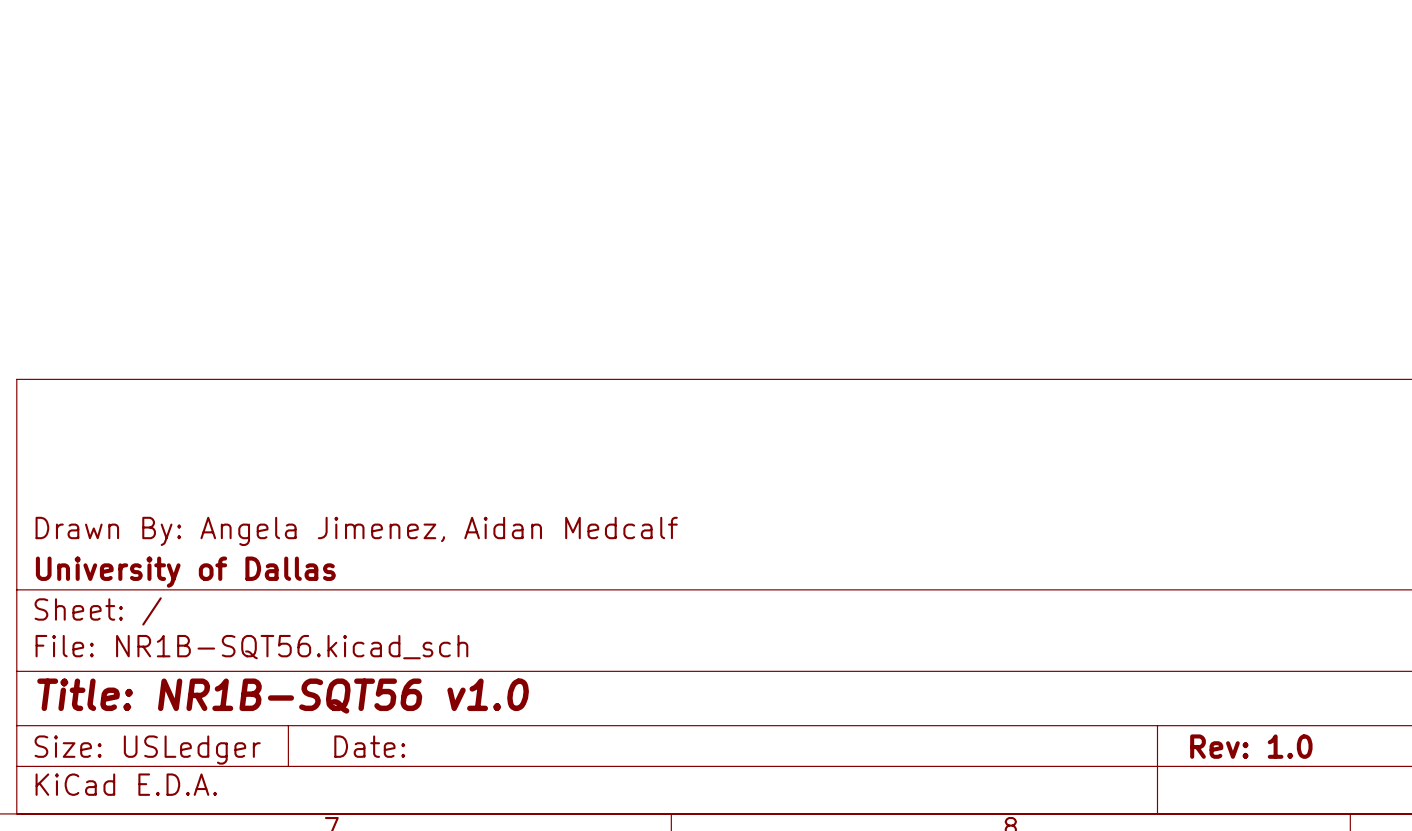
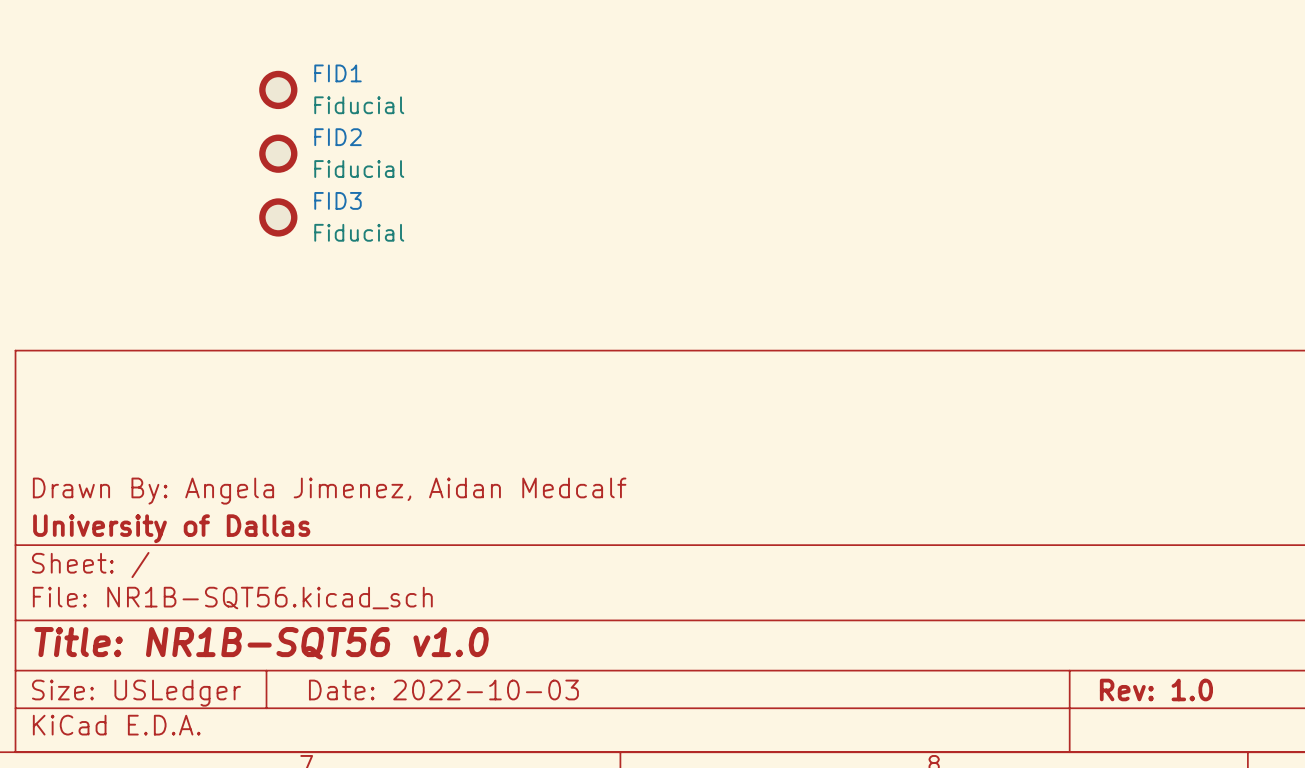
FID1: none -> Fiducial (278, 89)
FID2: none -> Fiducial (278, 153)
FID3: none -> Fiducial (278, 217)
title block: Date: (369, 746) -> Date: 2022-10-03 (443, 689)

